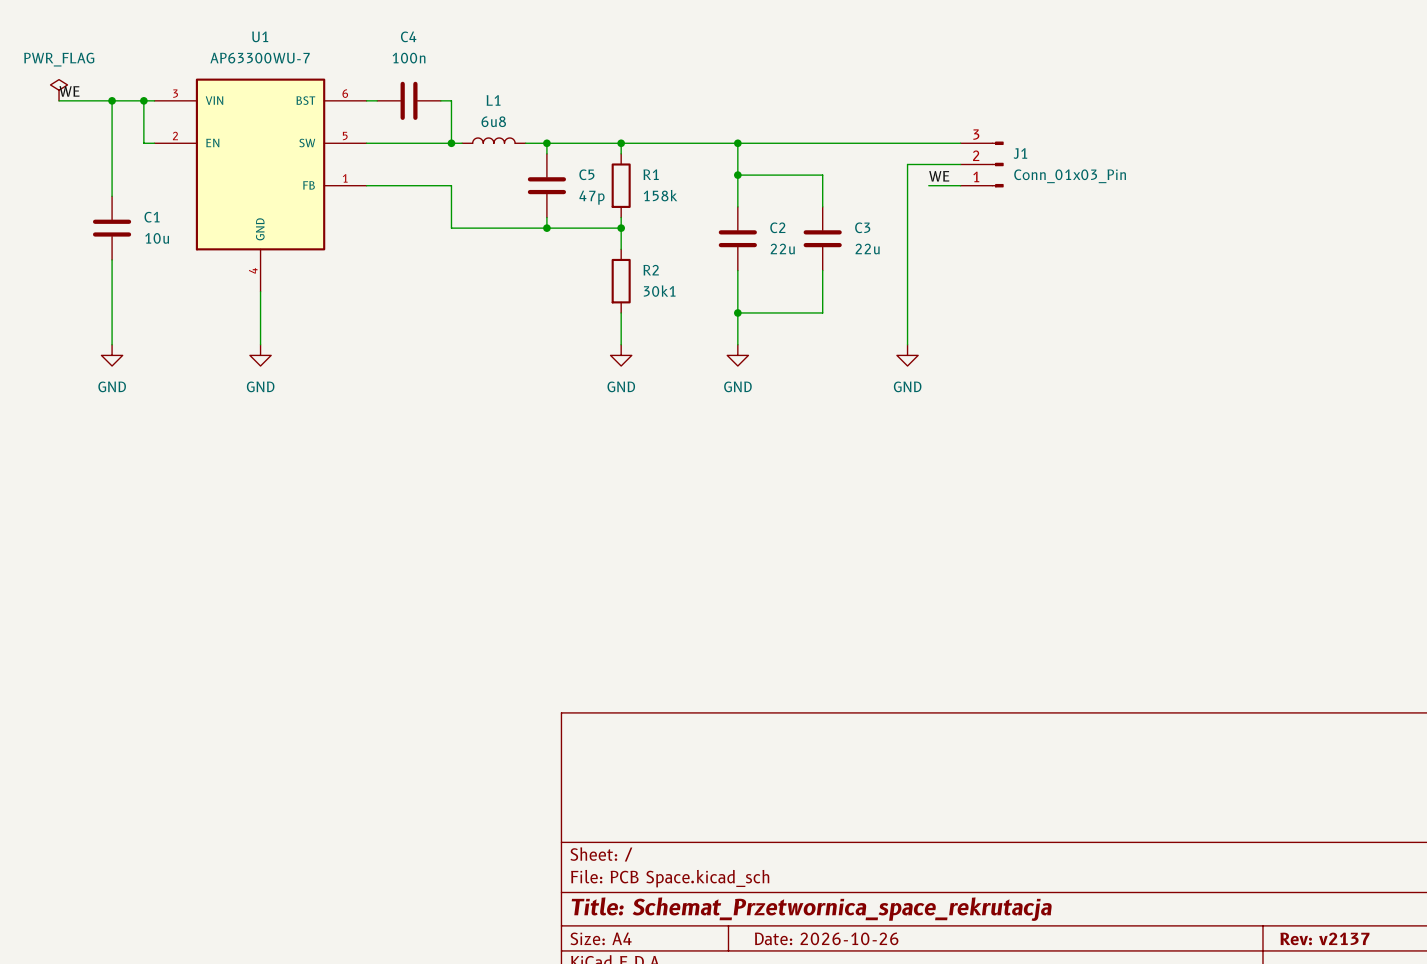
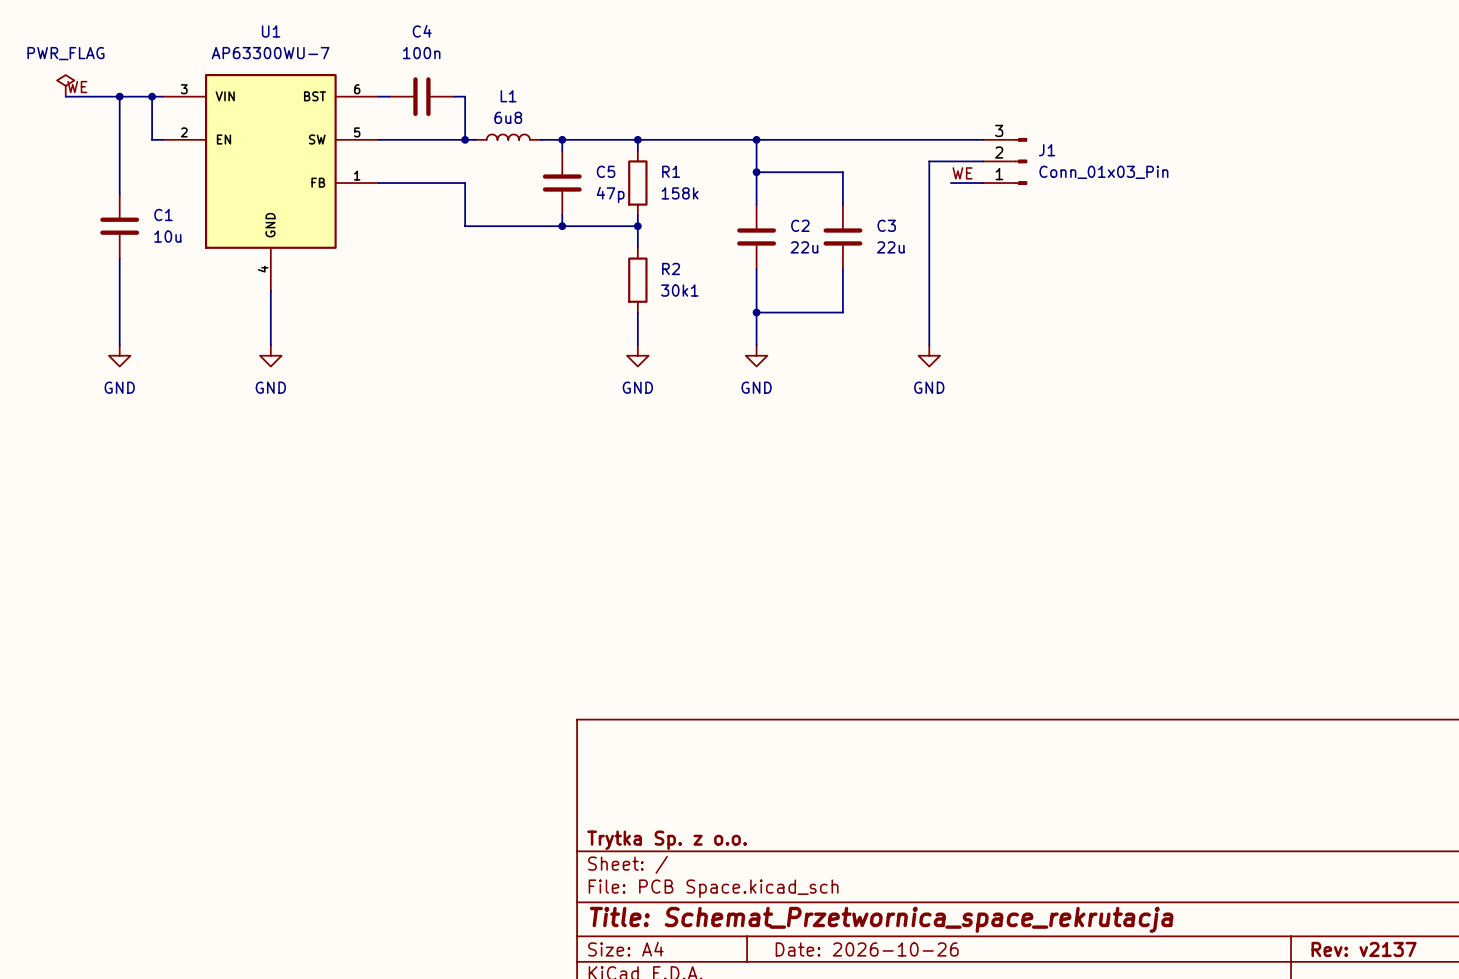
title block: none -> Trytka Sp. z o.o. (667, 840)

